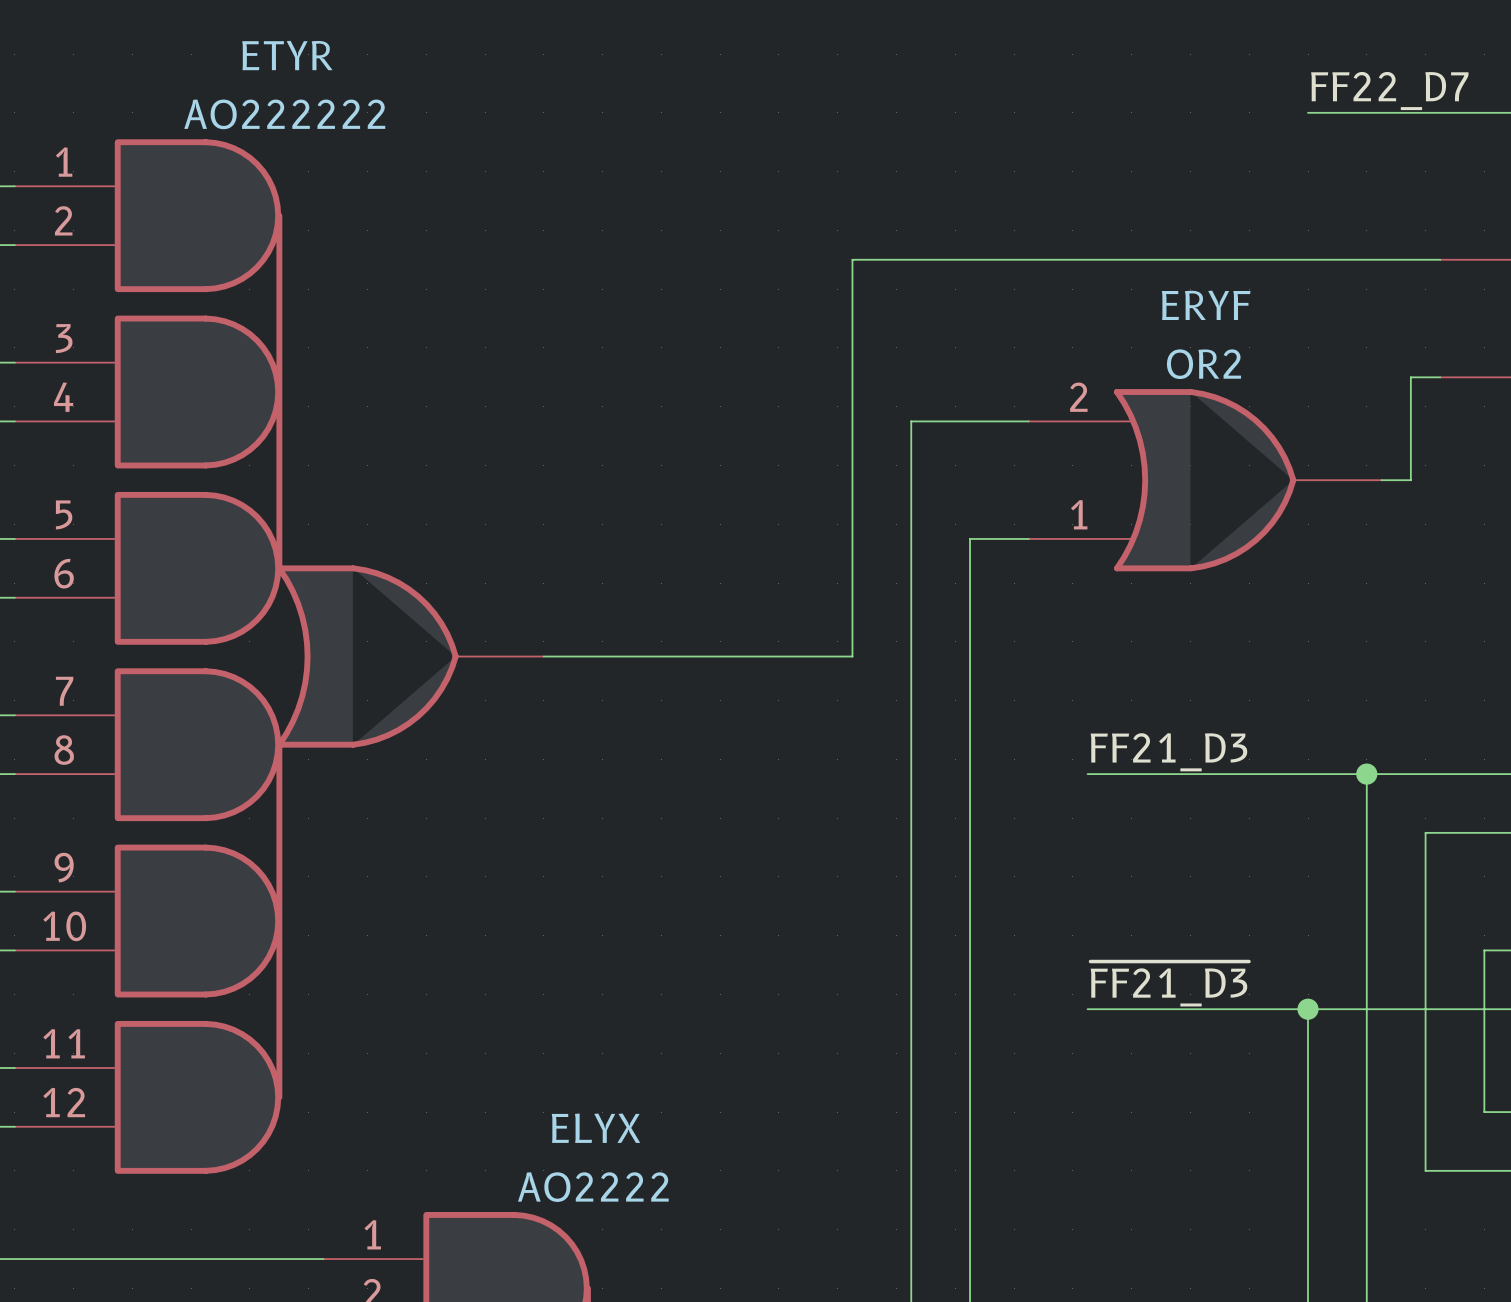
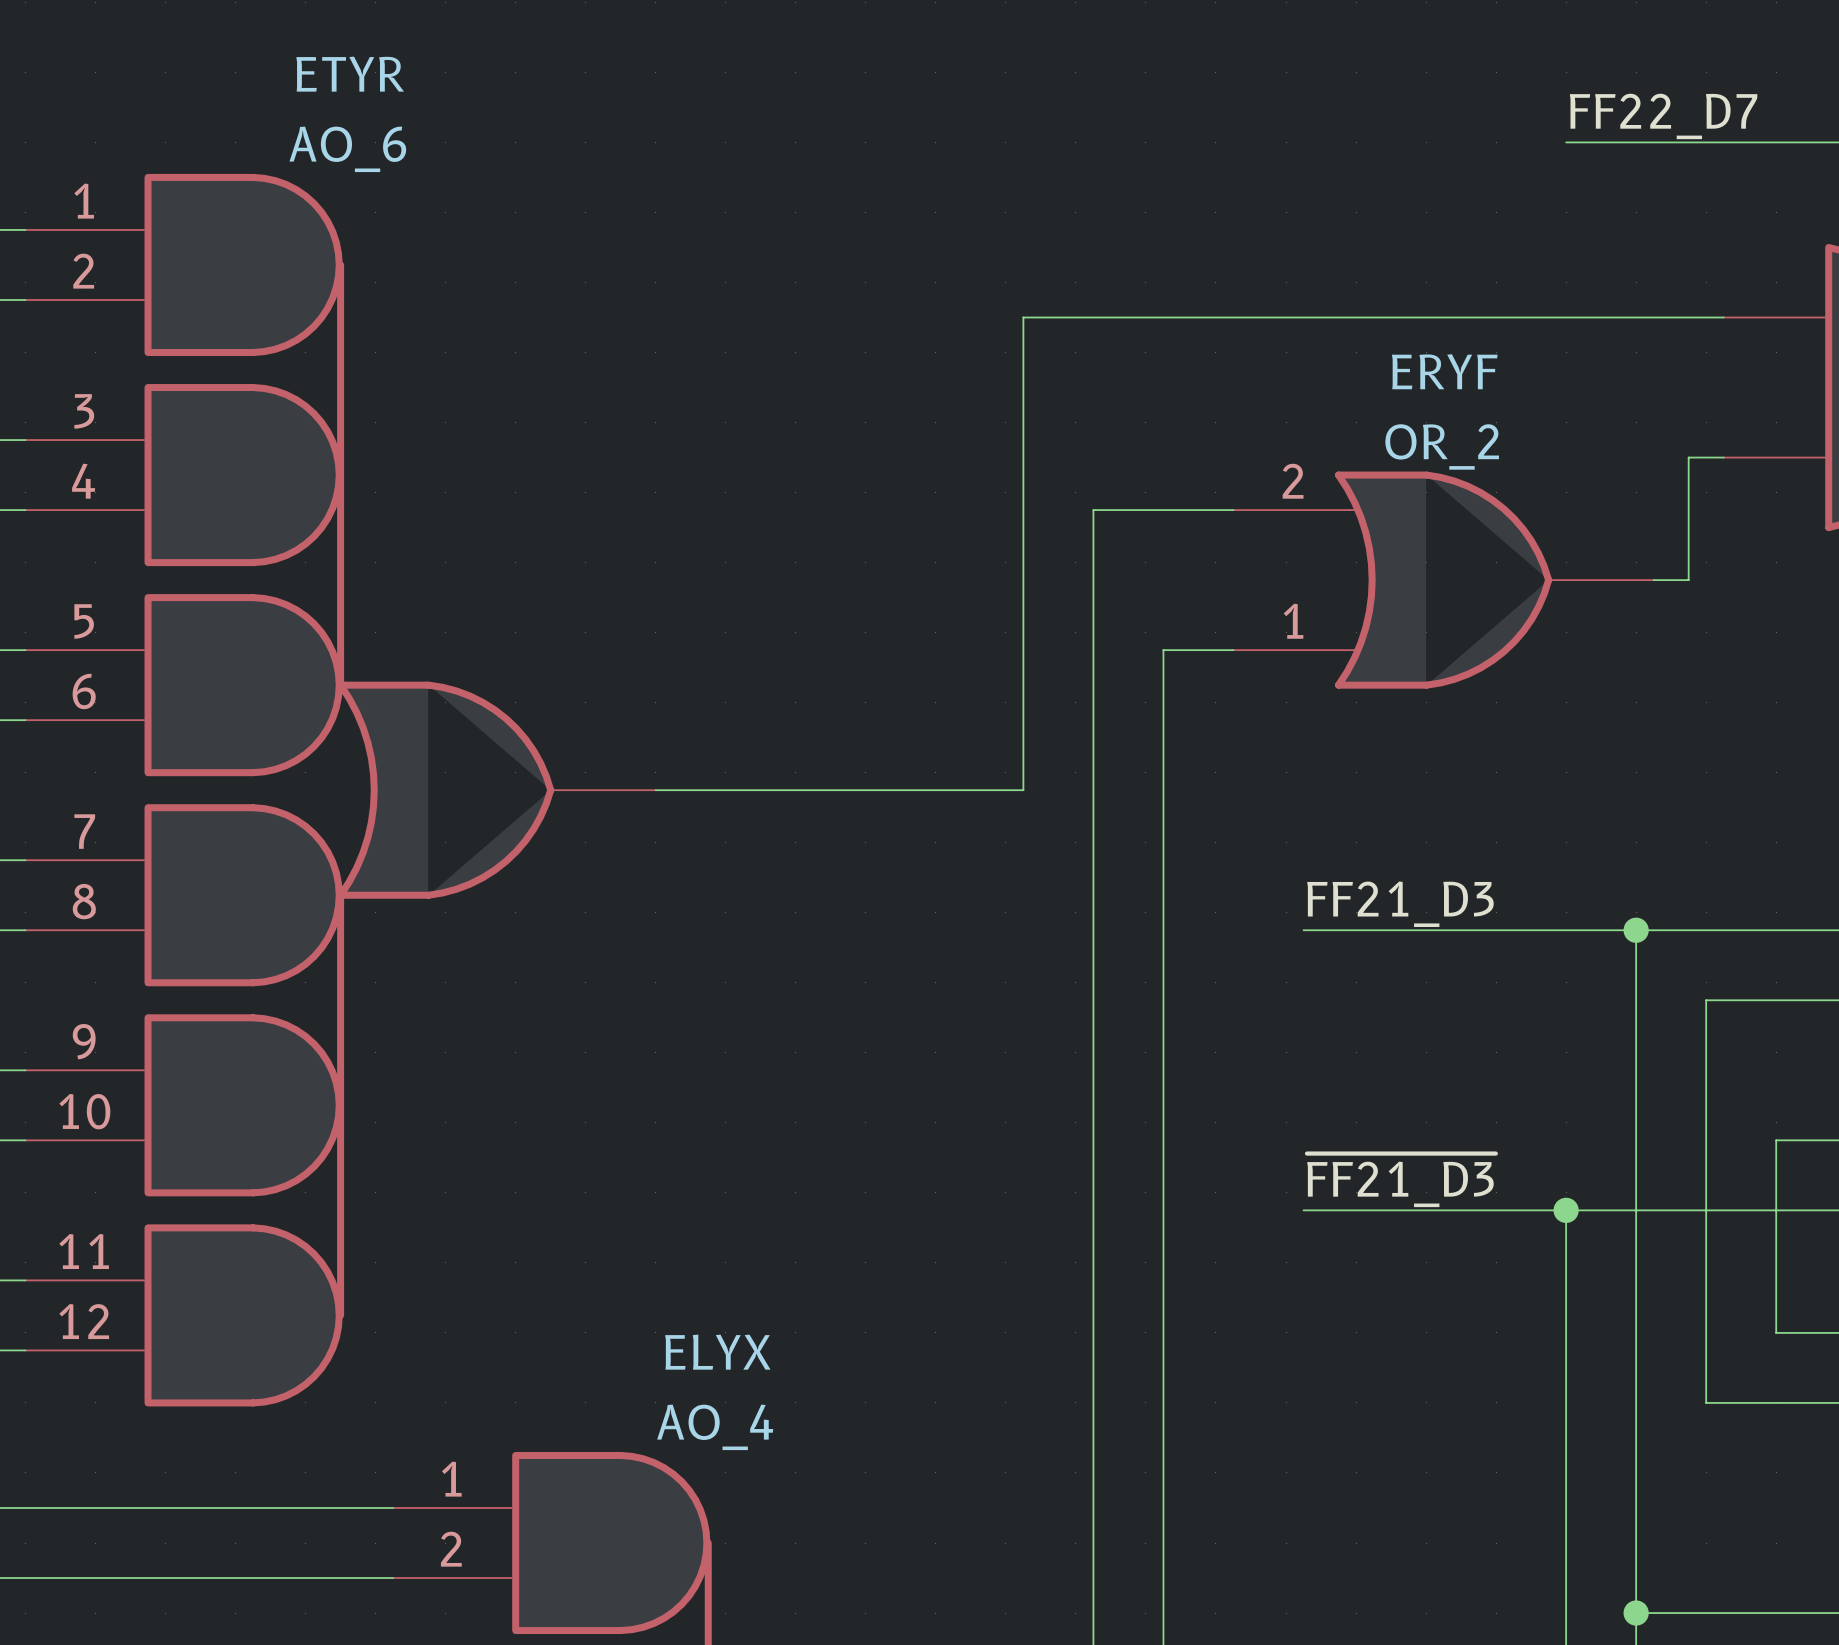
ETYR value: AO222222 (284, 114) -> AO_6 (347, 149)
ERYF value: OR2 (1203, 364) -> OR_2 (1442, 446)
ELYX value: AO2222 (593, 1187) -> AO_4 (715, 1427)

